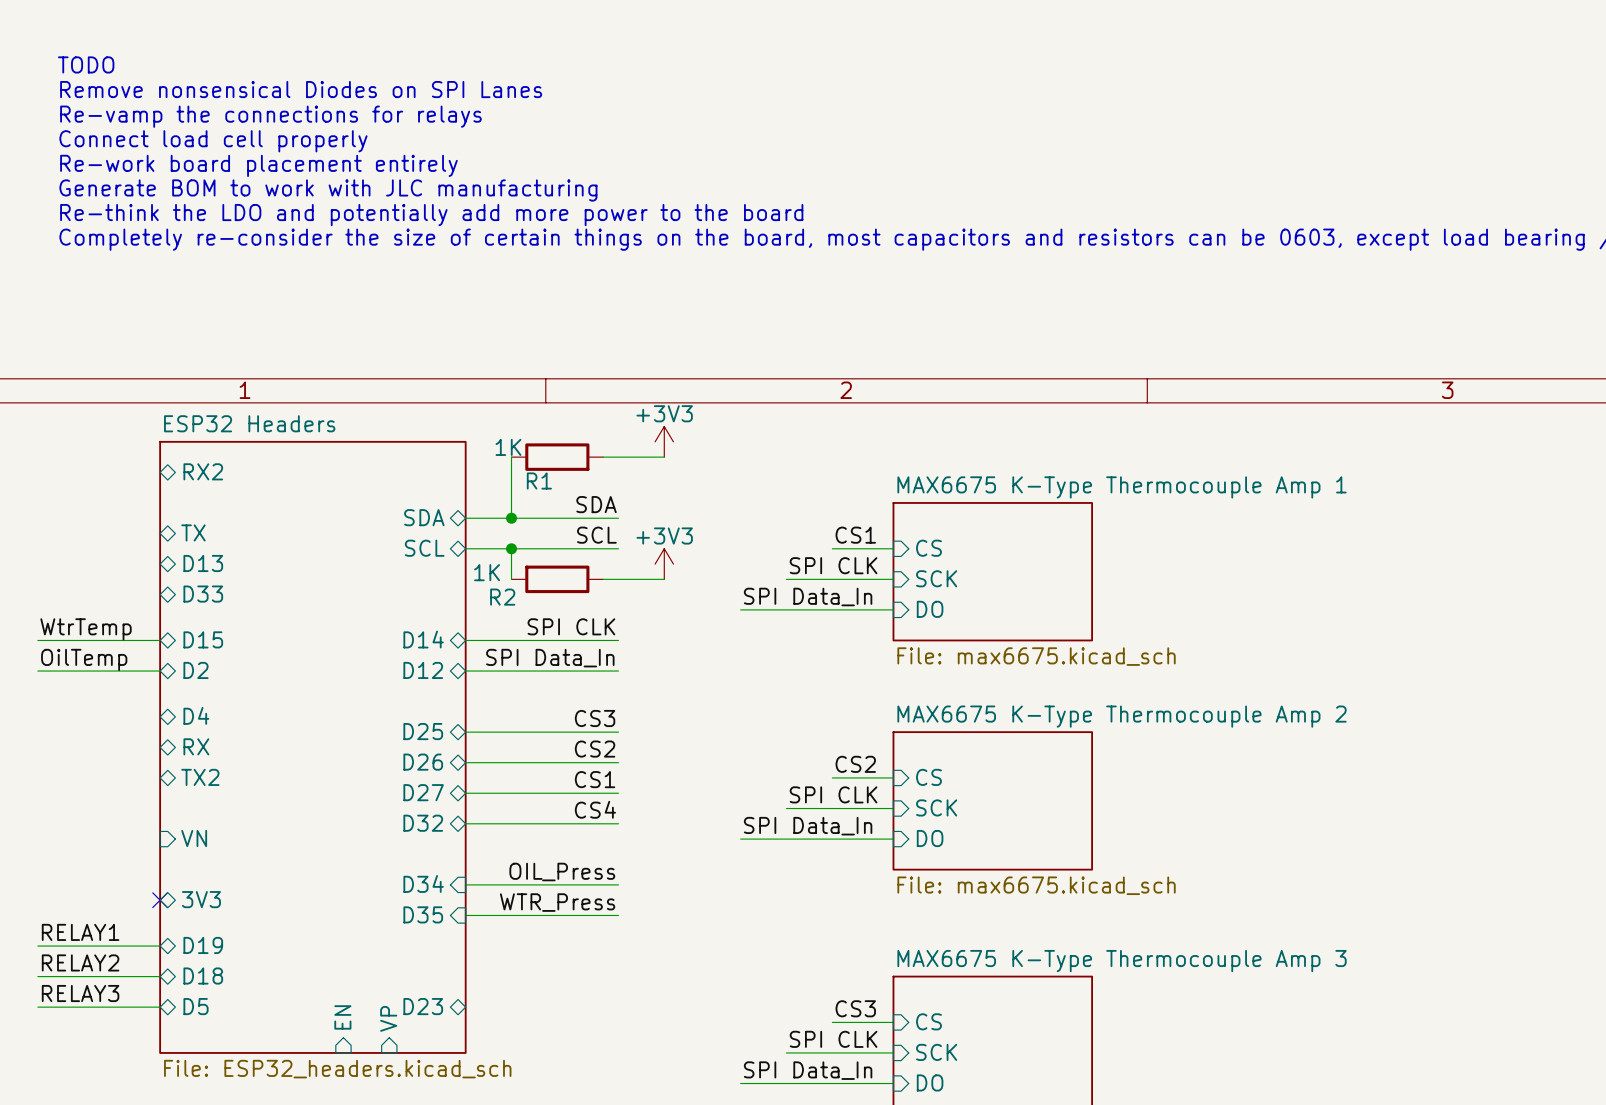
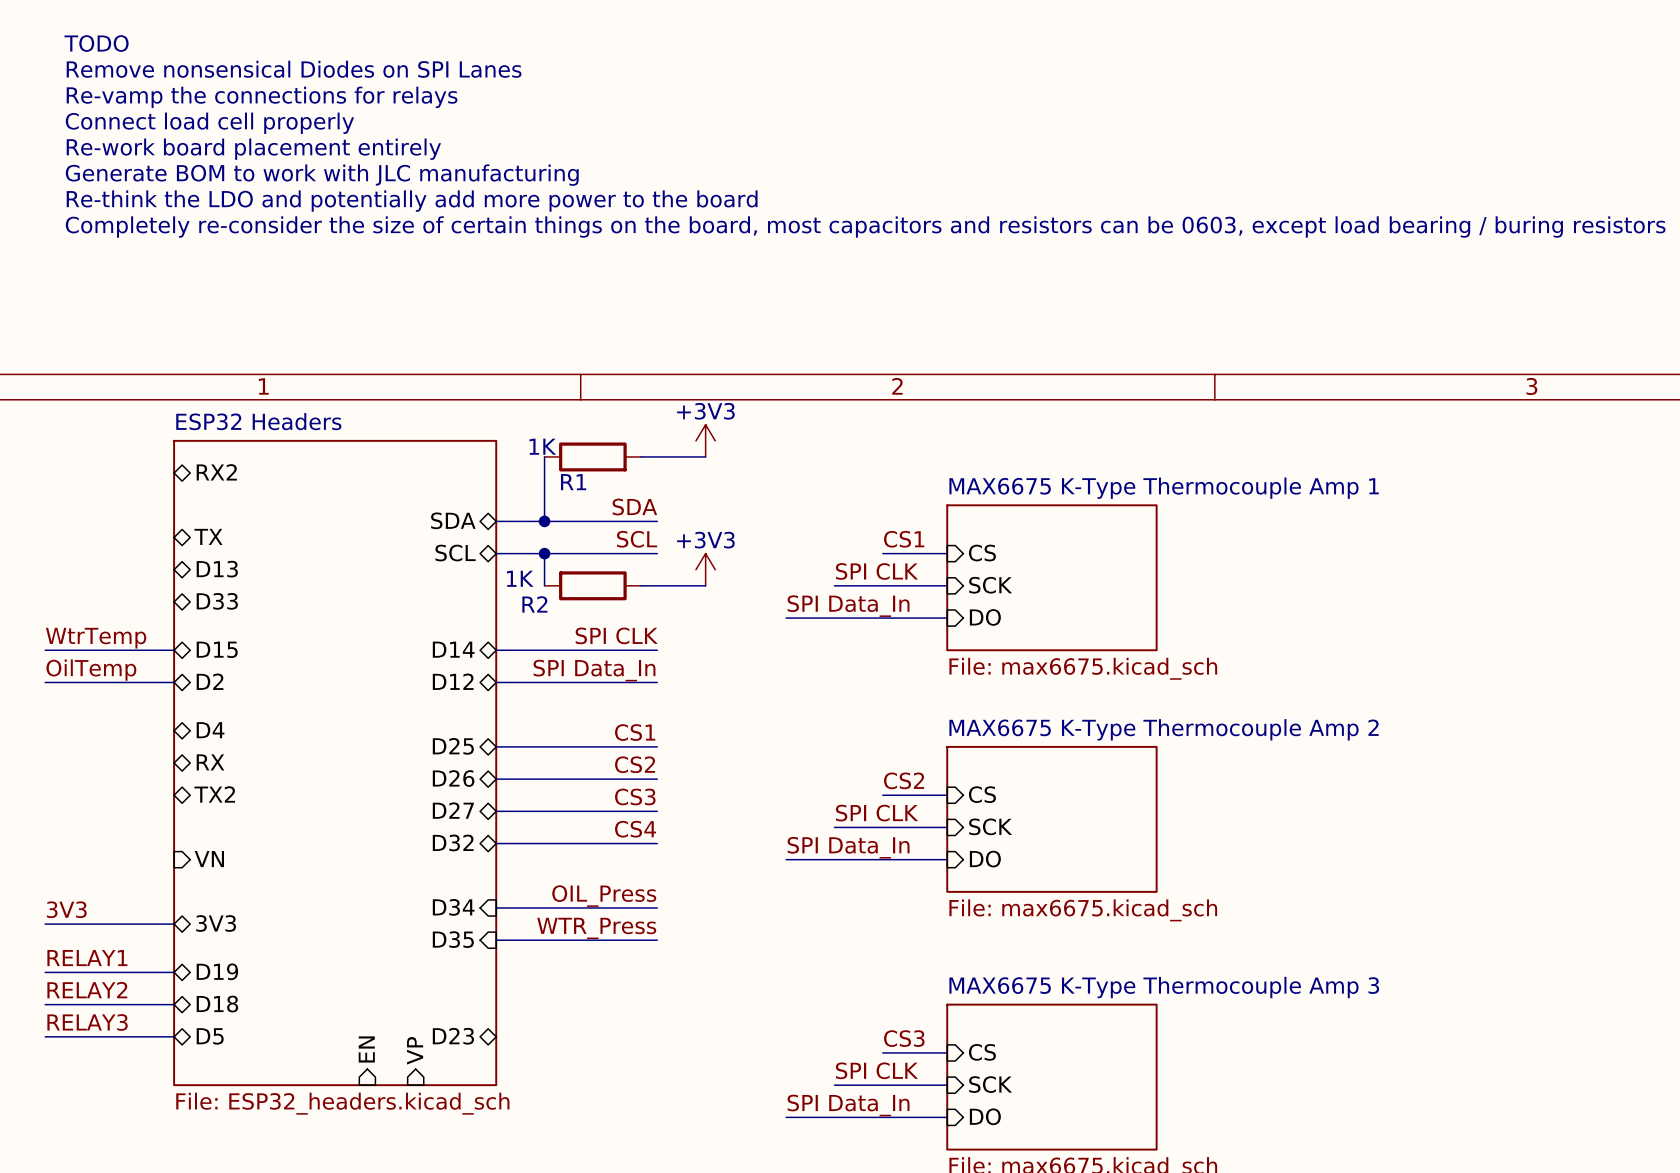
label: CS3 (595, 718) -> CS1 (635, 732)
label: CS1 (595, 779) -> CS3 (635, 796)
label: none -> 3V3 (66, 909)
wire: none -> (45, 924) (174, 924)
no-connect mark: (160, 900) -> none

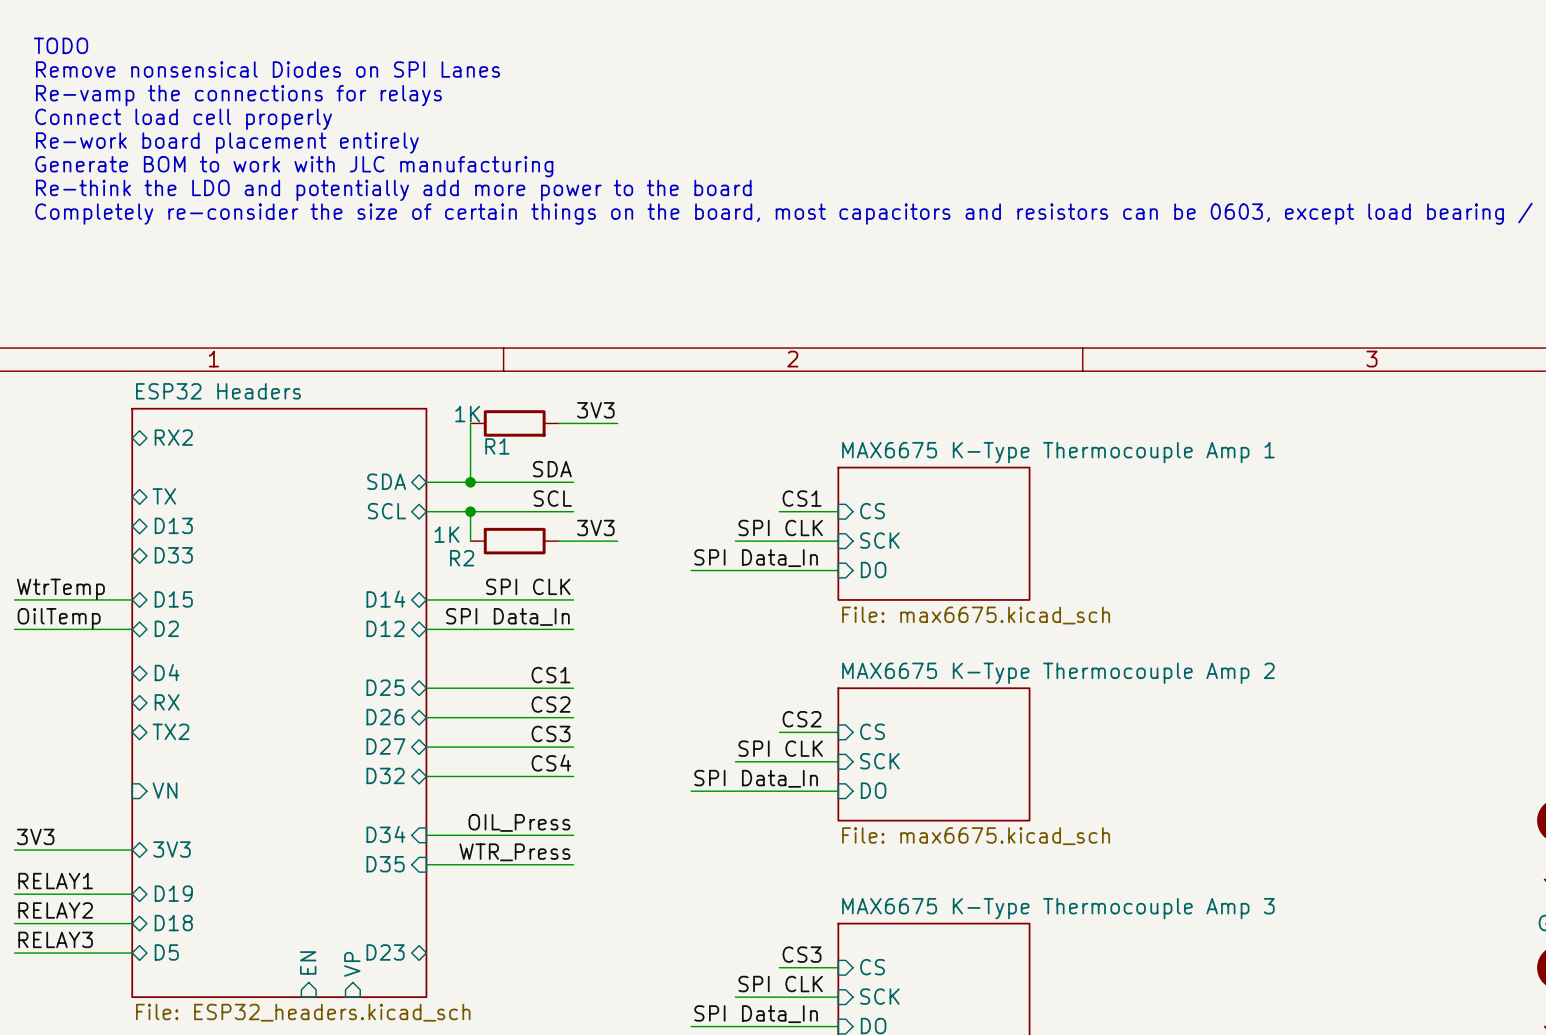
power symbol: +3V3 (705, 440) -> none
label: none -> 3V3 (595, 410)
power symbol: +3V3 (705, 569) -> none
label: none -> 3V3 (595, 527)

